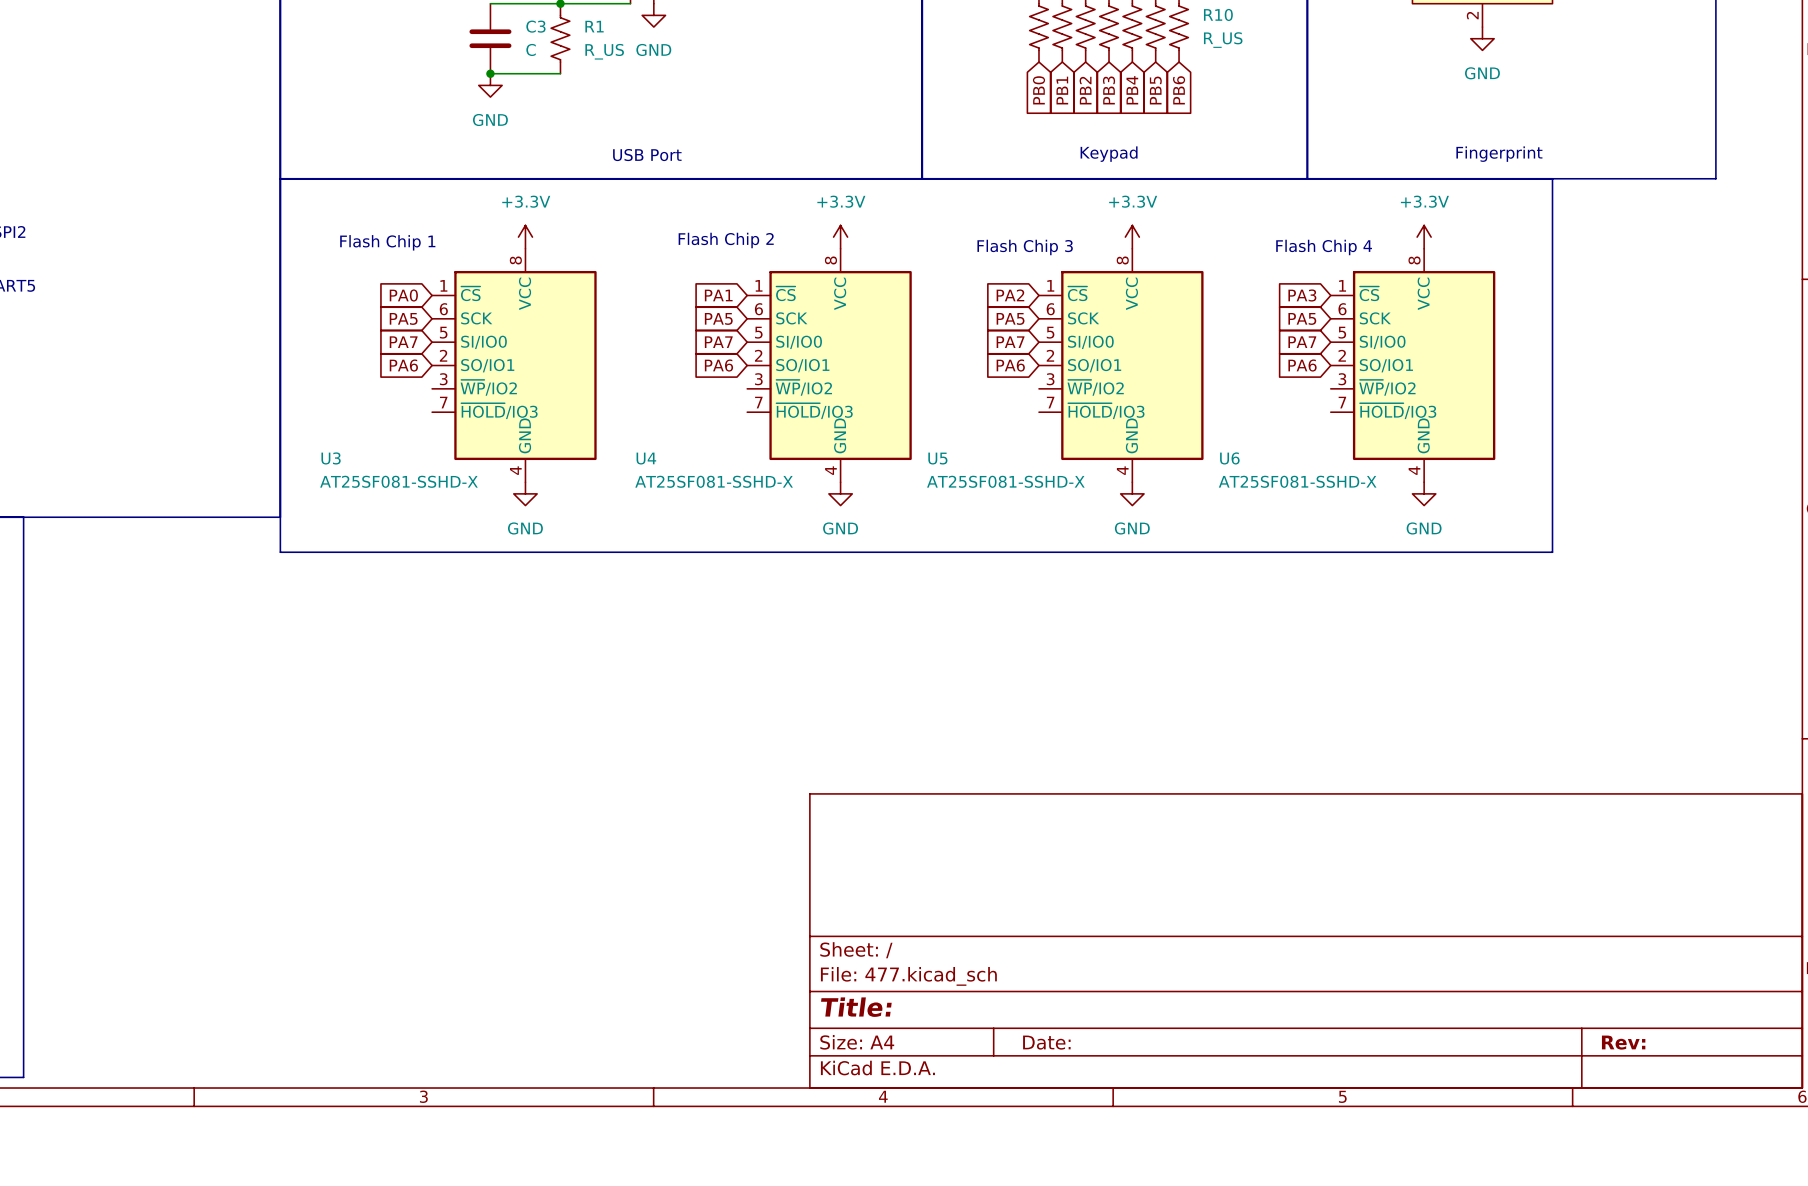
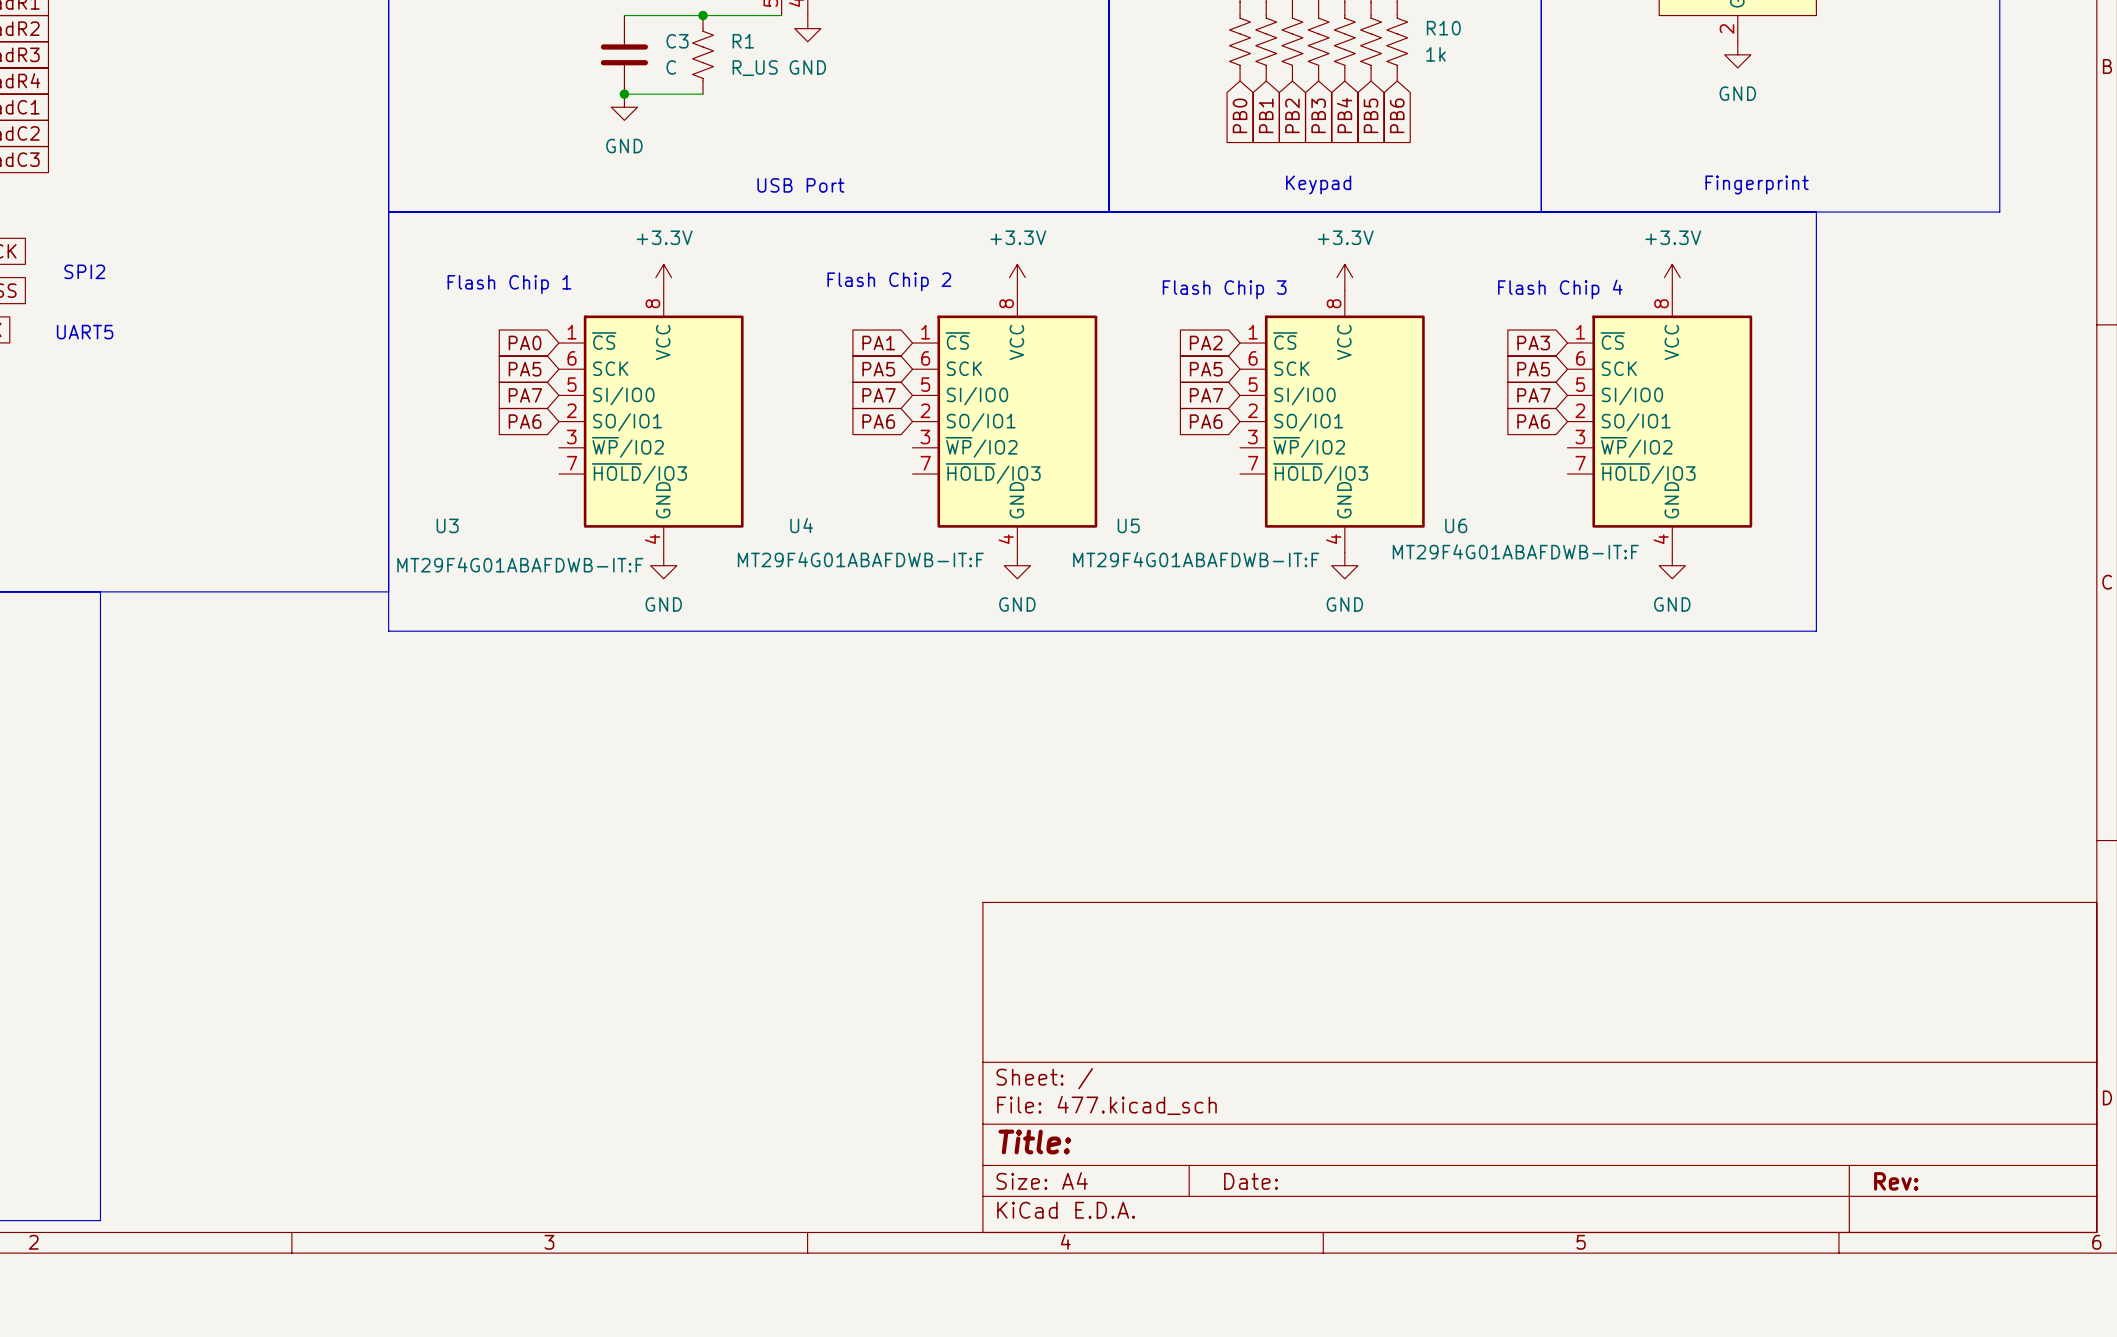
R10 value: R_US (1223, 40) -> 1k (1436, 54)
U3 value: AT25SF081-SSHD-X (398, 481) -> MT29F4G01ABAFDWB-IT:F (520, 564)
U4 value: AT25SF081-SSHD-X (714, 481) -> MT29F4G01ABAFDWB-IT:F (860, 559)
U5 value: AT25SF081-SSHD-X (1005, 481) -> MT29F4G01ABAFDWB-IT:F (1196, 559)
U6 value: AT25SF081-SSHD-X (1297, 481) -> MT29F4G01ABAFDWB-IT:F (1515, 551)

